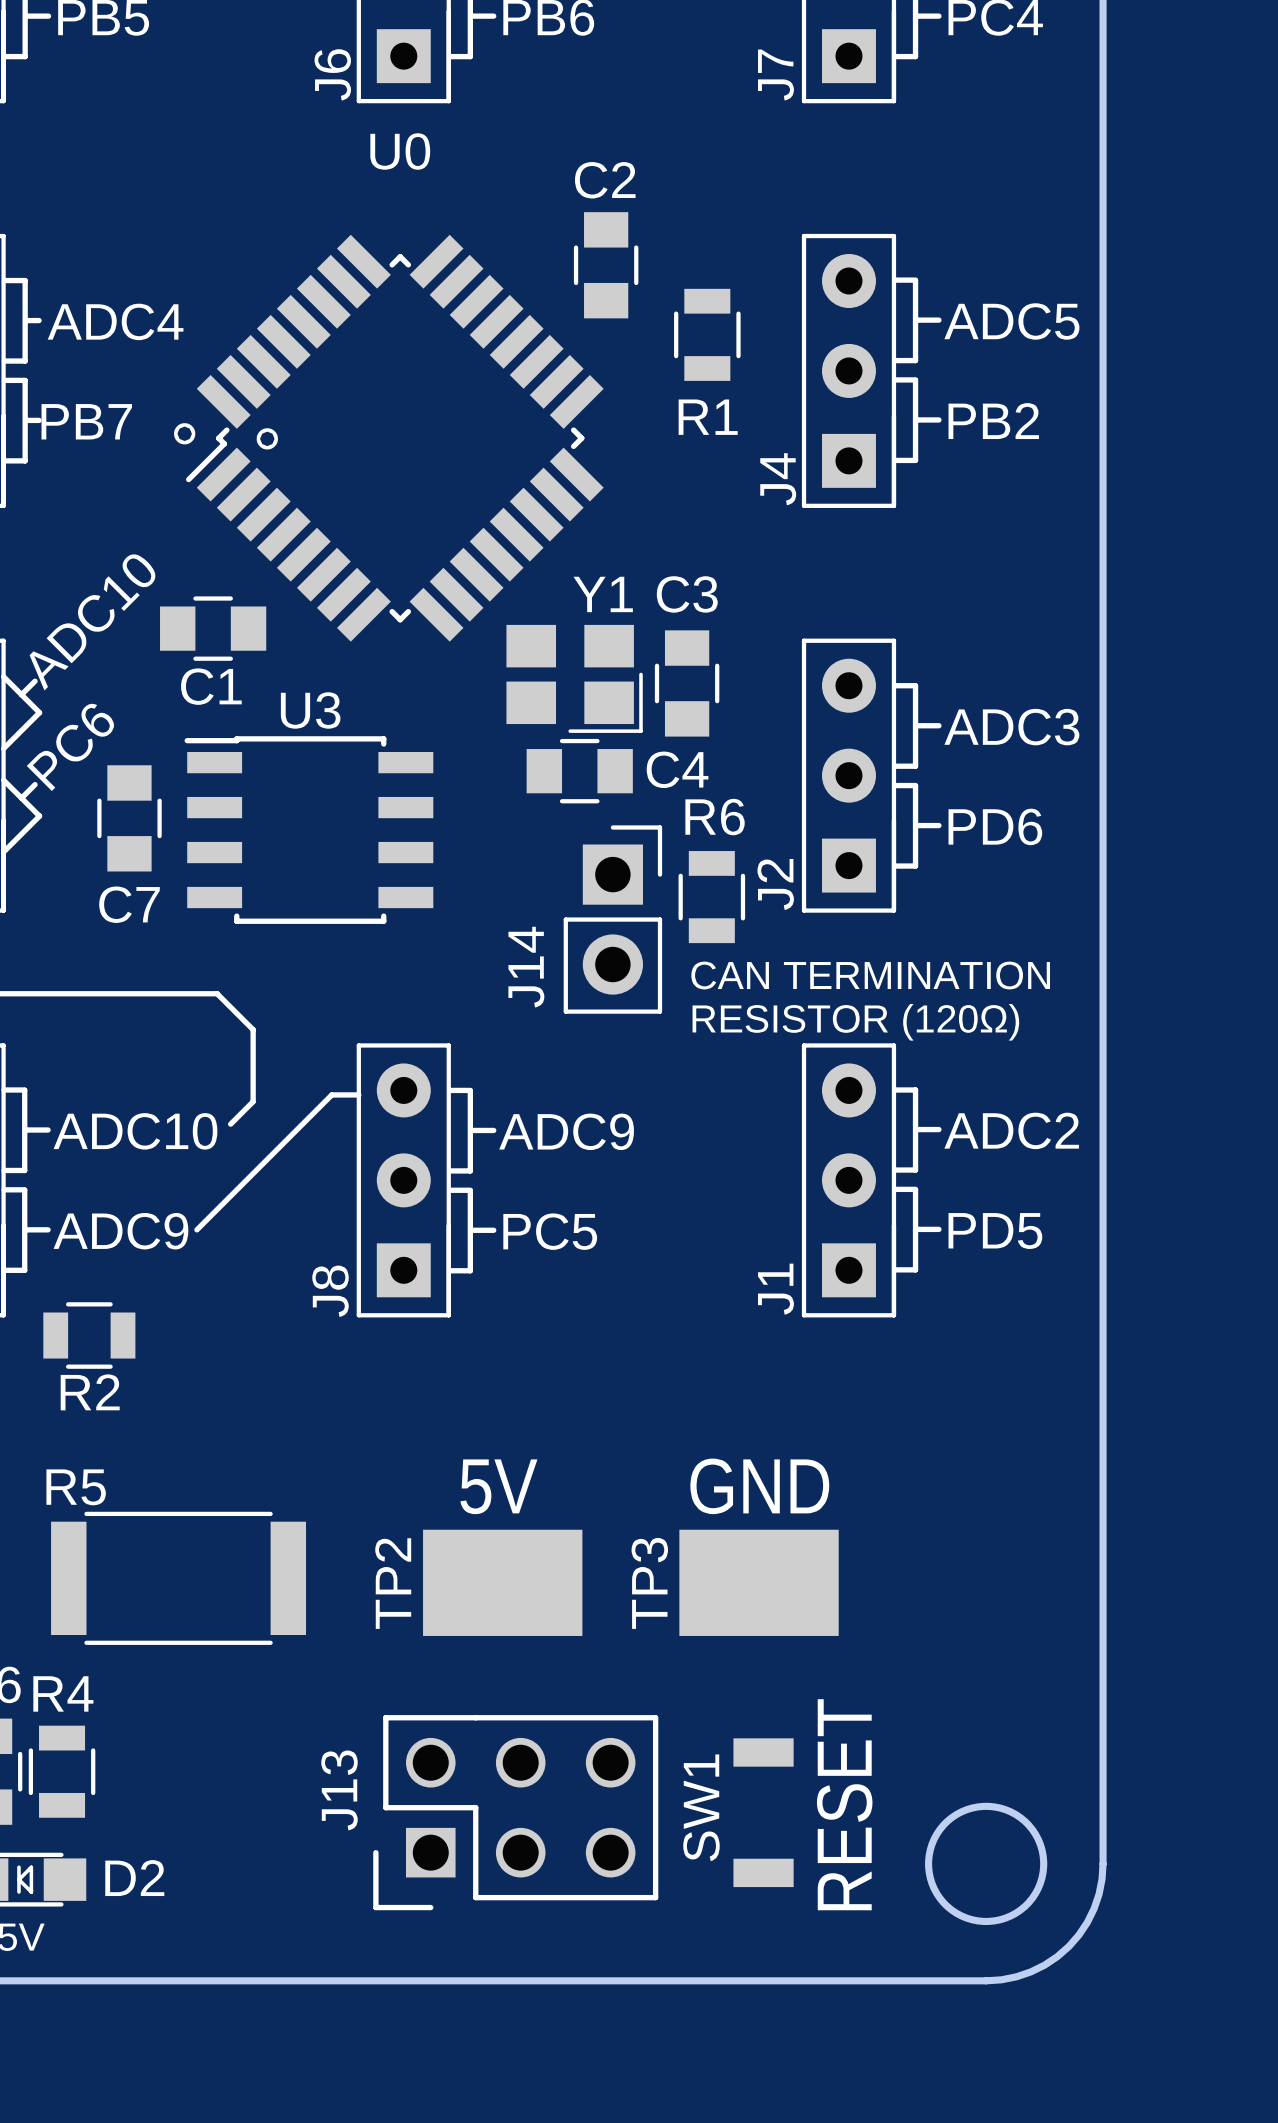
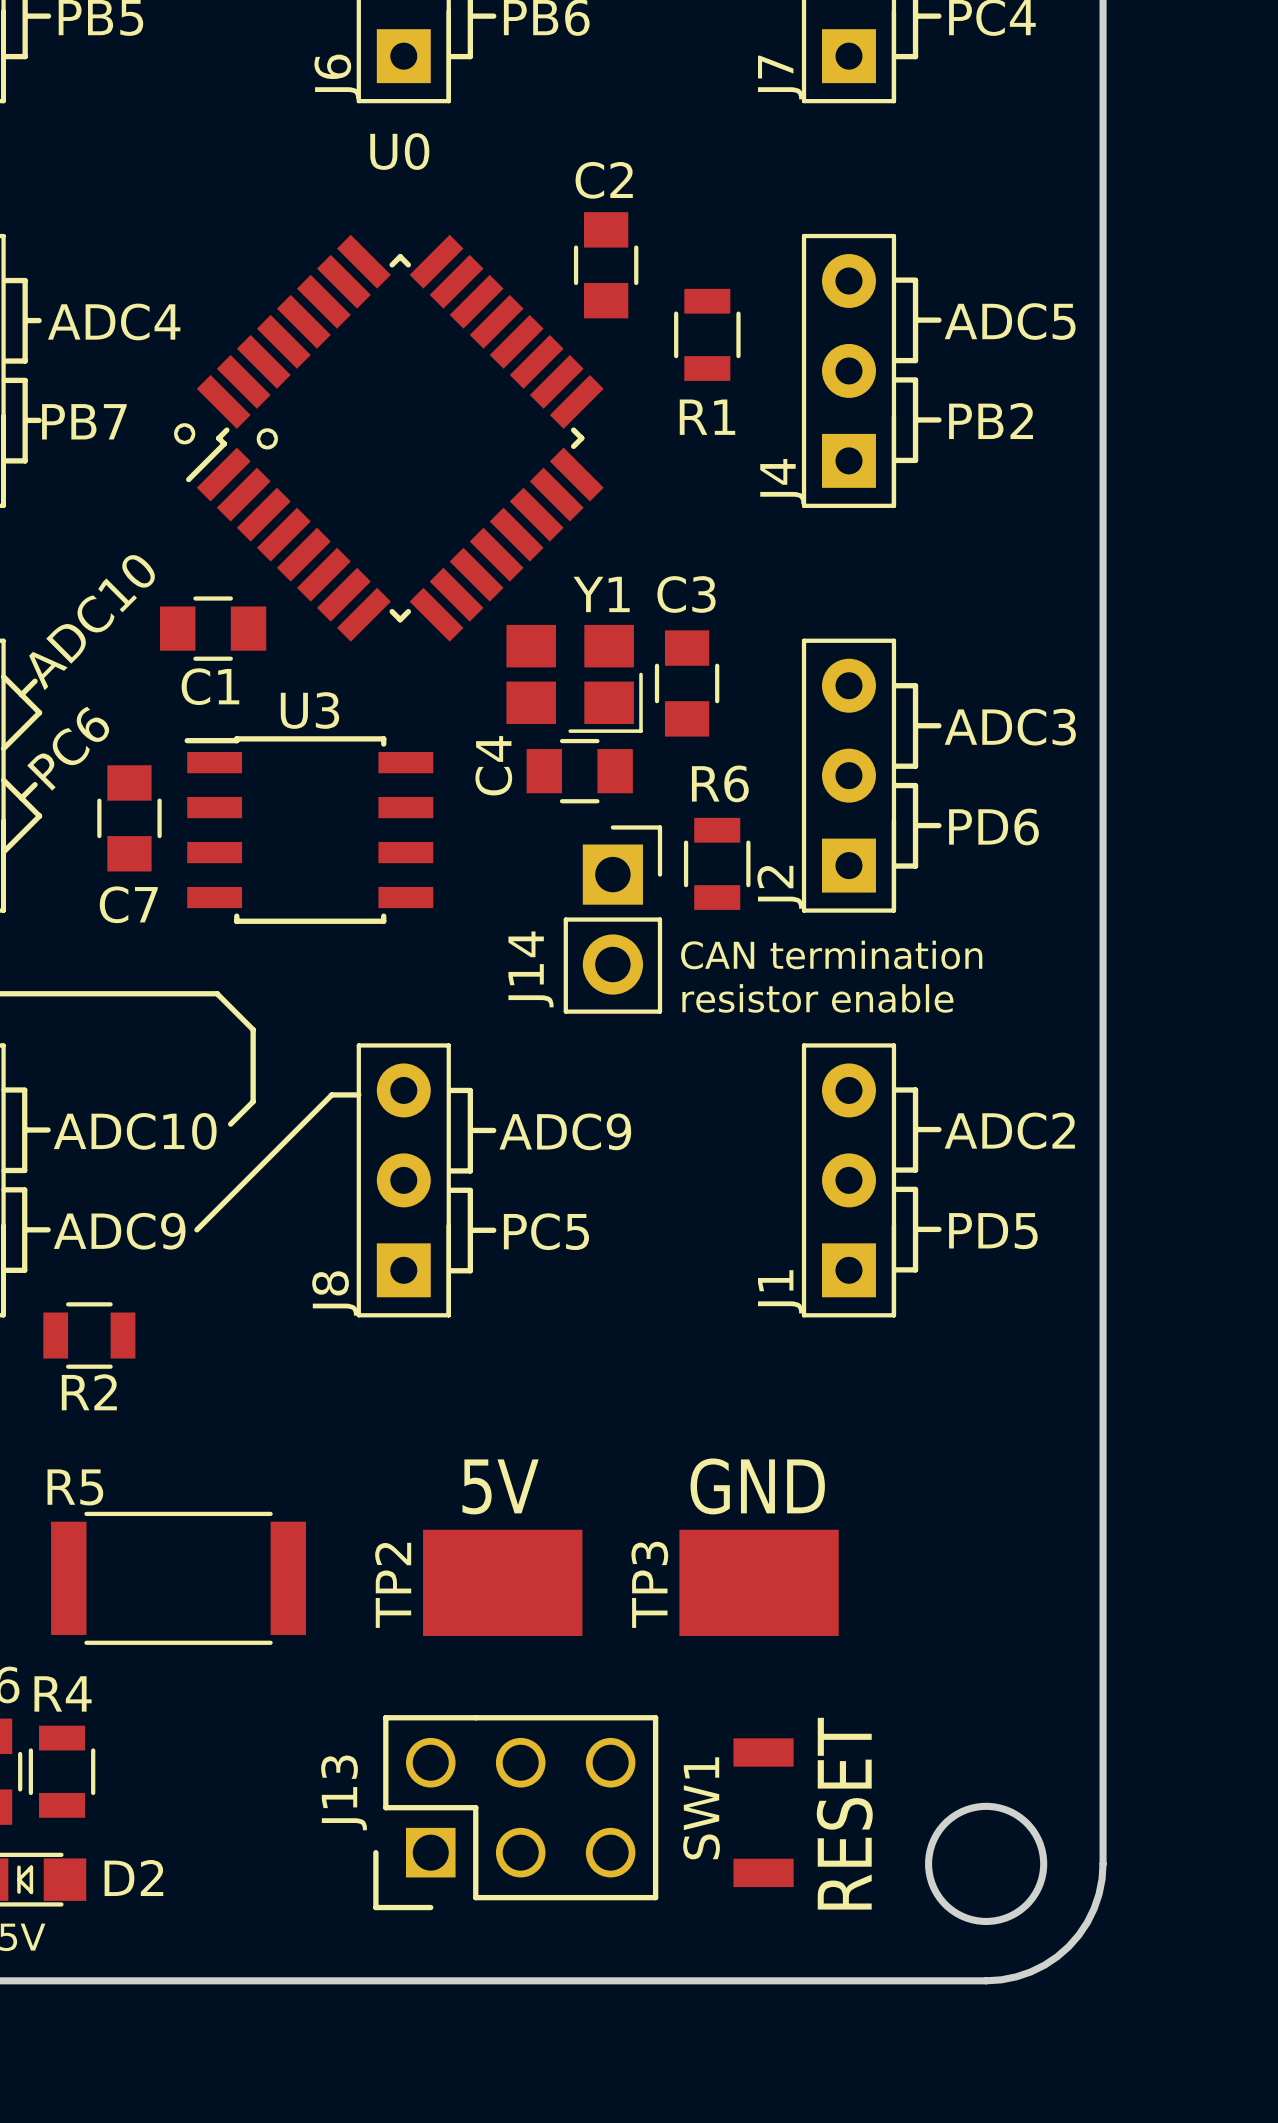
C4 name rotation: 0° (677, 769) -> 90° counterclockwise (493, 765)
C4 name position: C4 (677, 769) -> C4 (493, 765)
R6 position: (711, 897) -> (717, 863)
text: none -> CAN termination (831, 954)
text: CAN TERMINATION (870, 975) -> none
text: none -> resistor enable (817, 998)
text: RESISTOR (120Ω) (855, 1022) -> none

